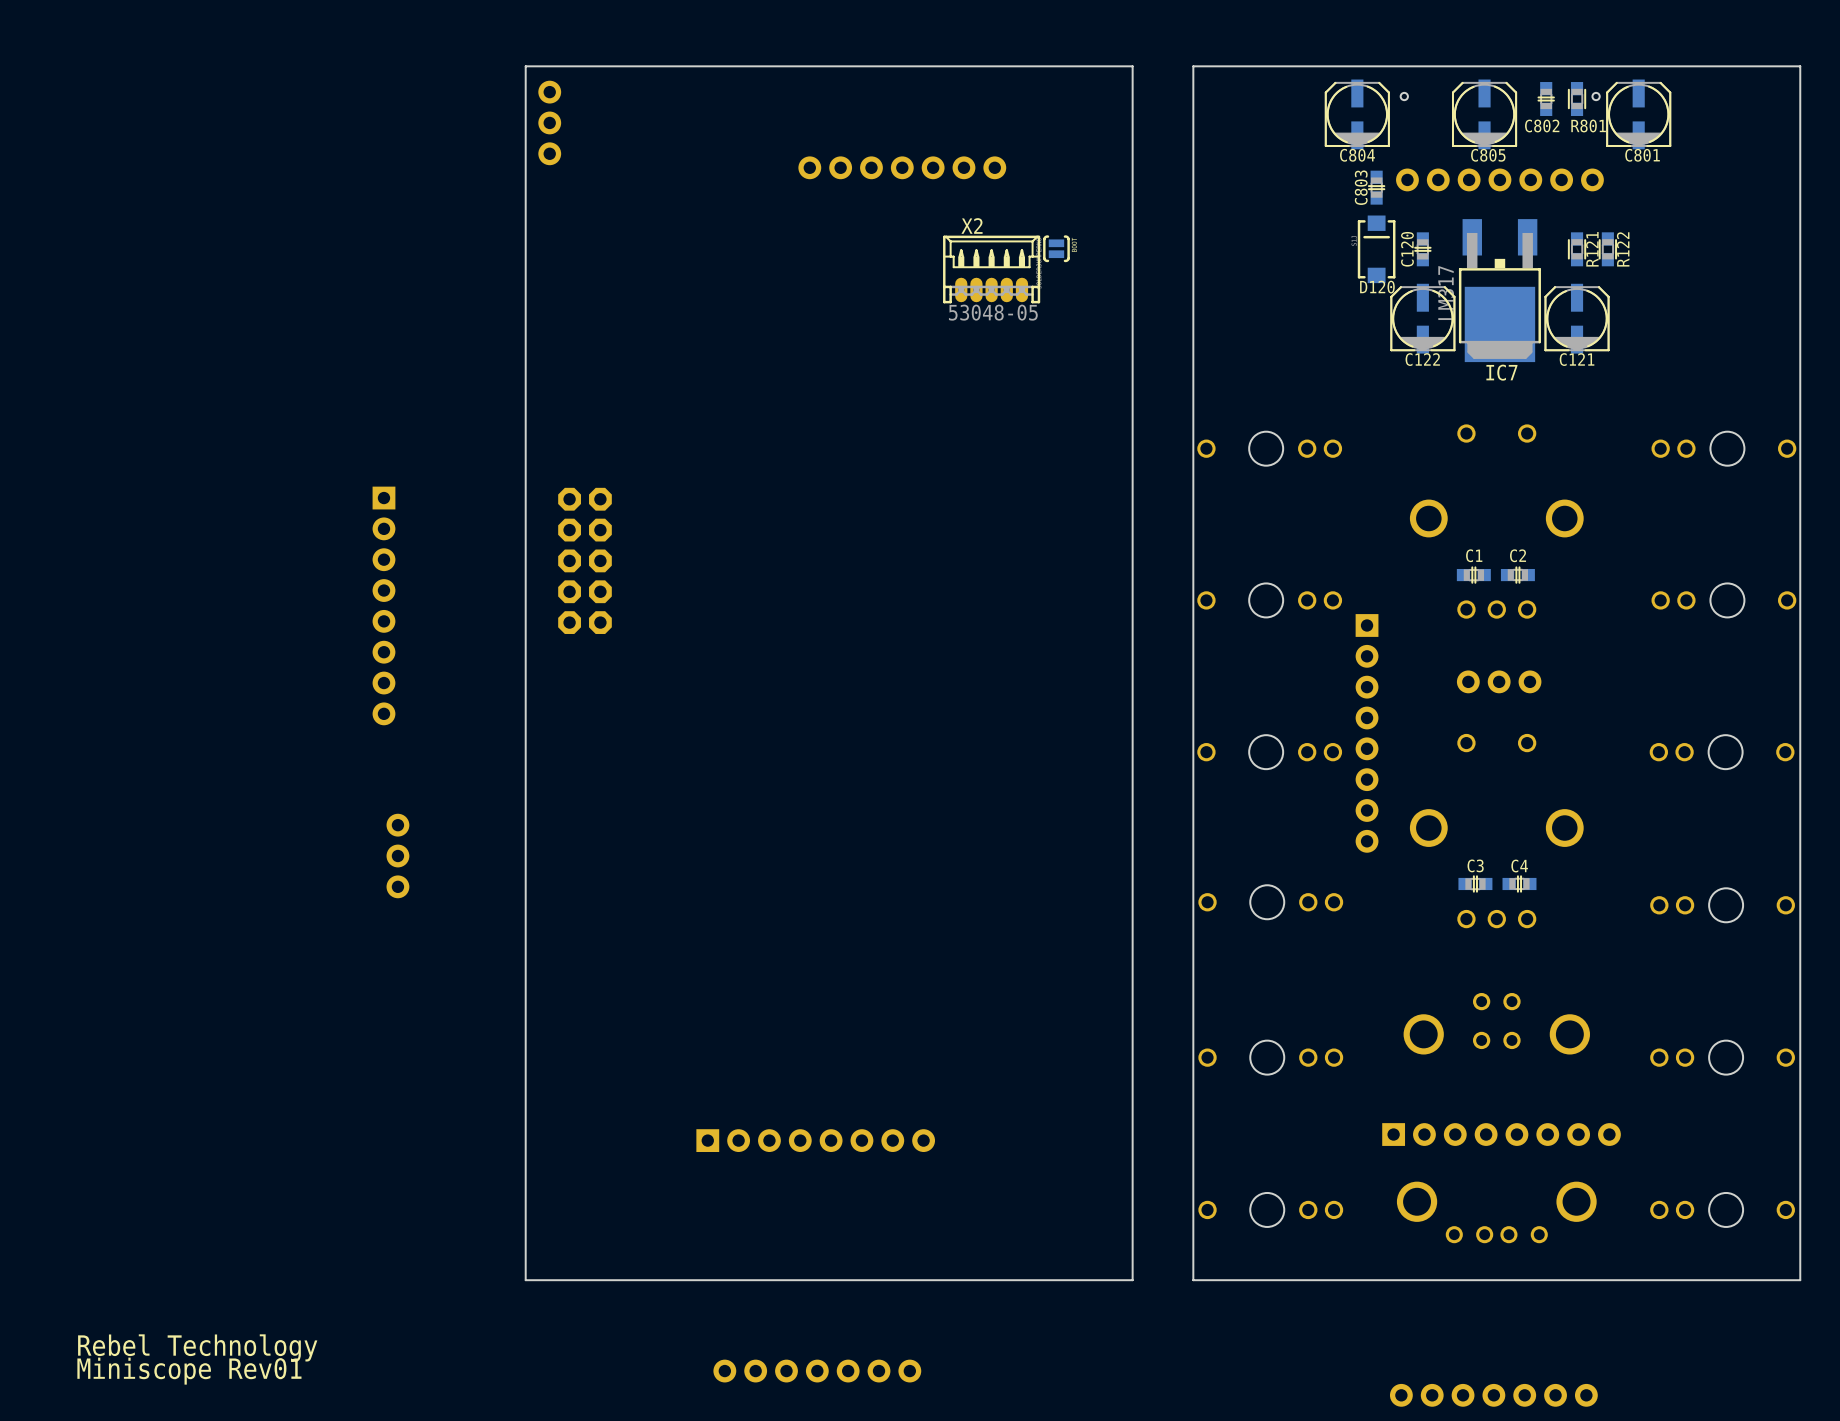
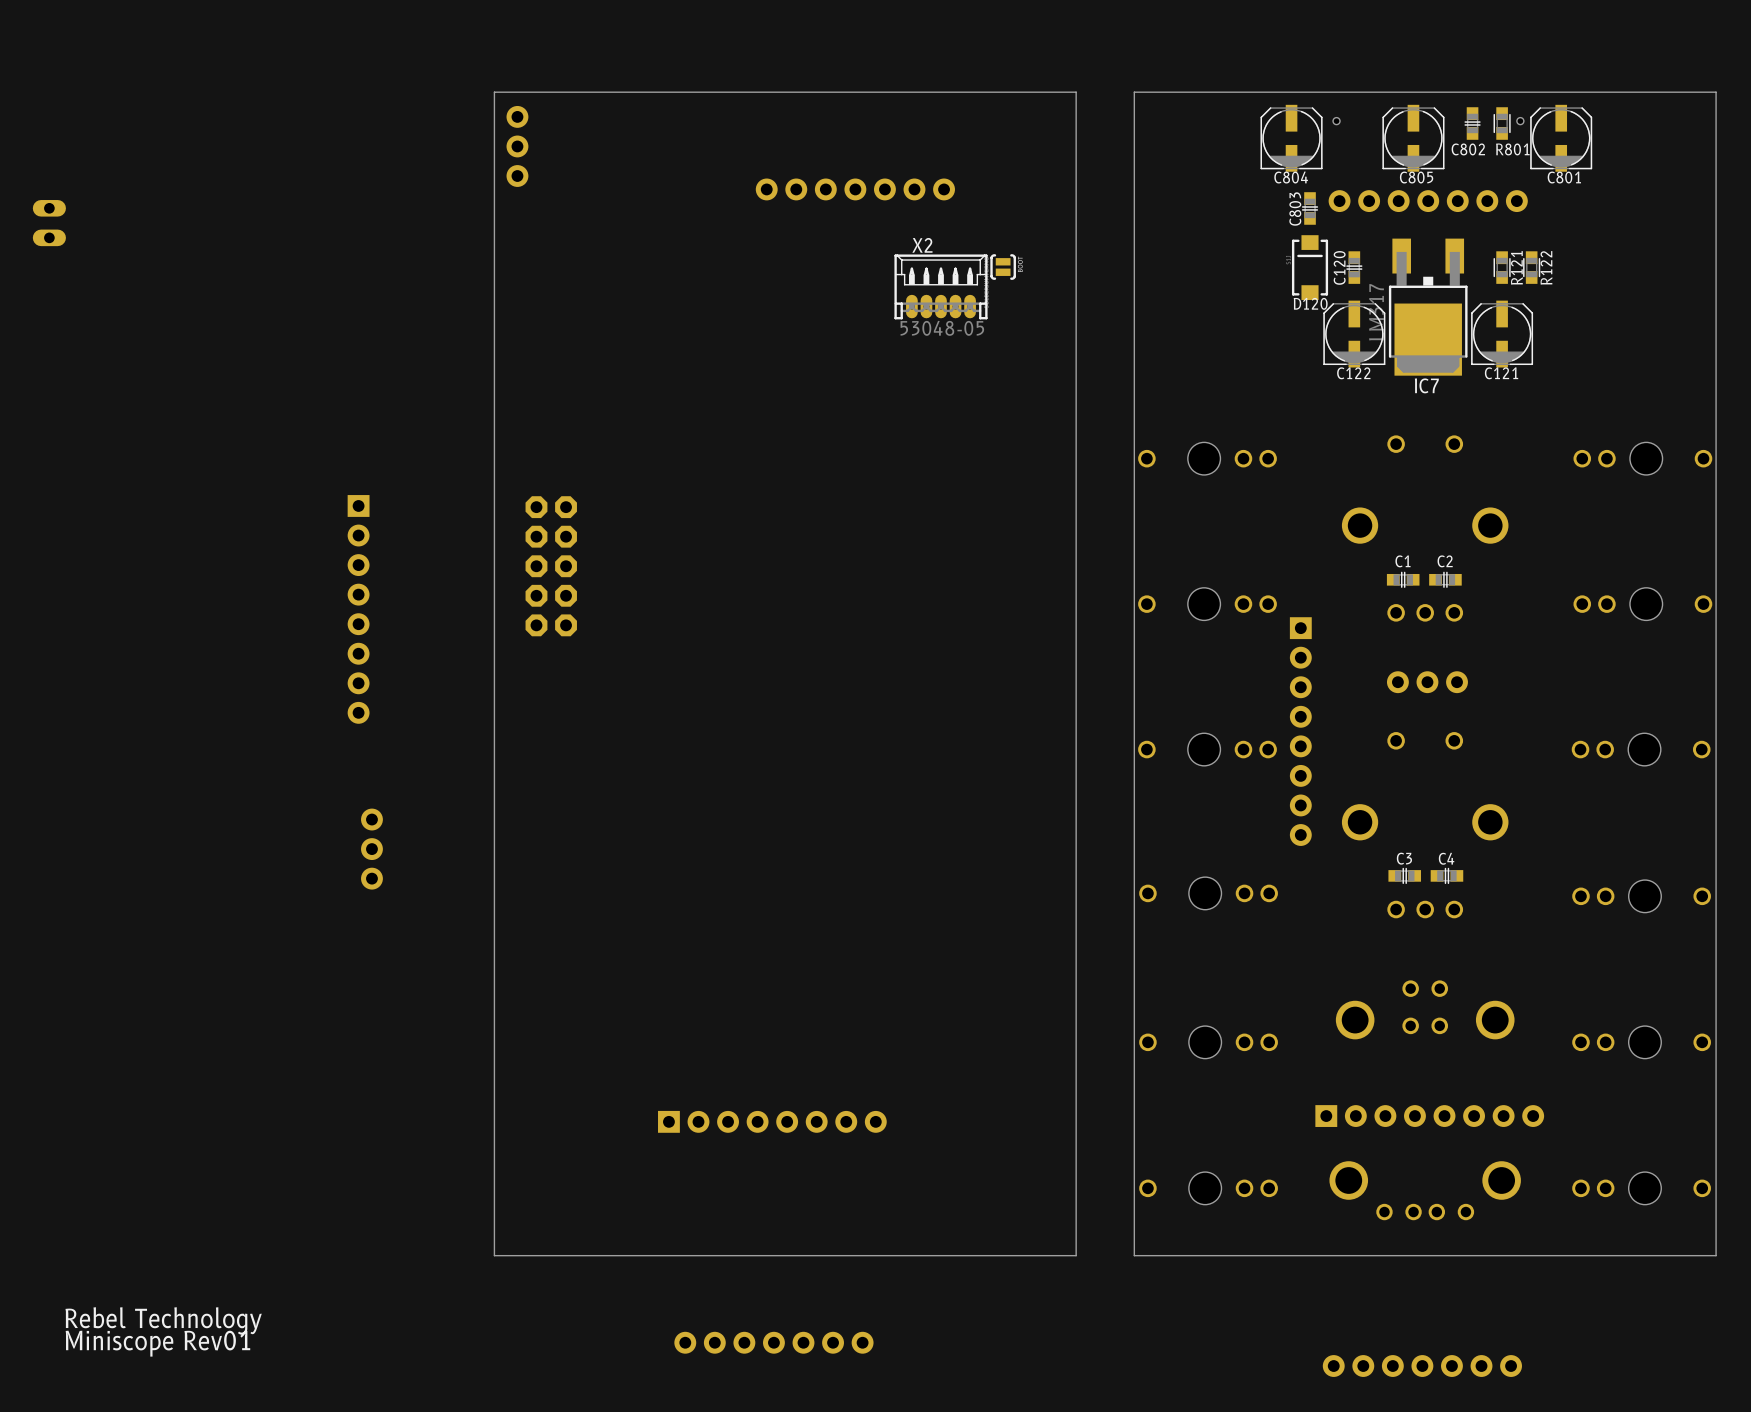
part: none -> (49, 223)

